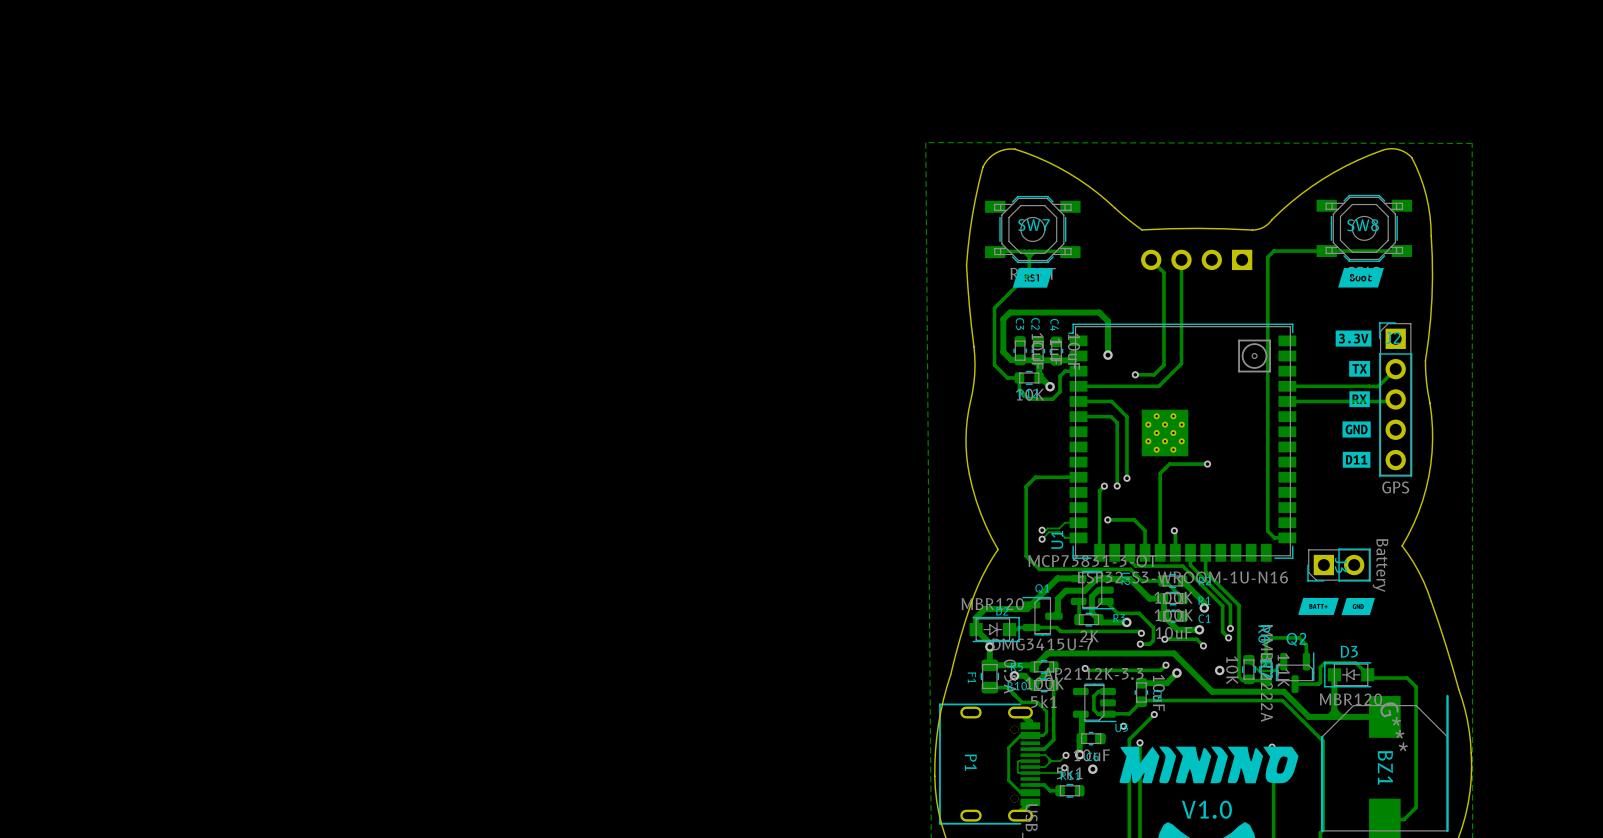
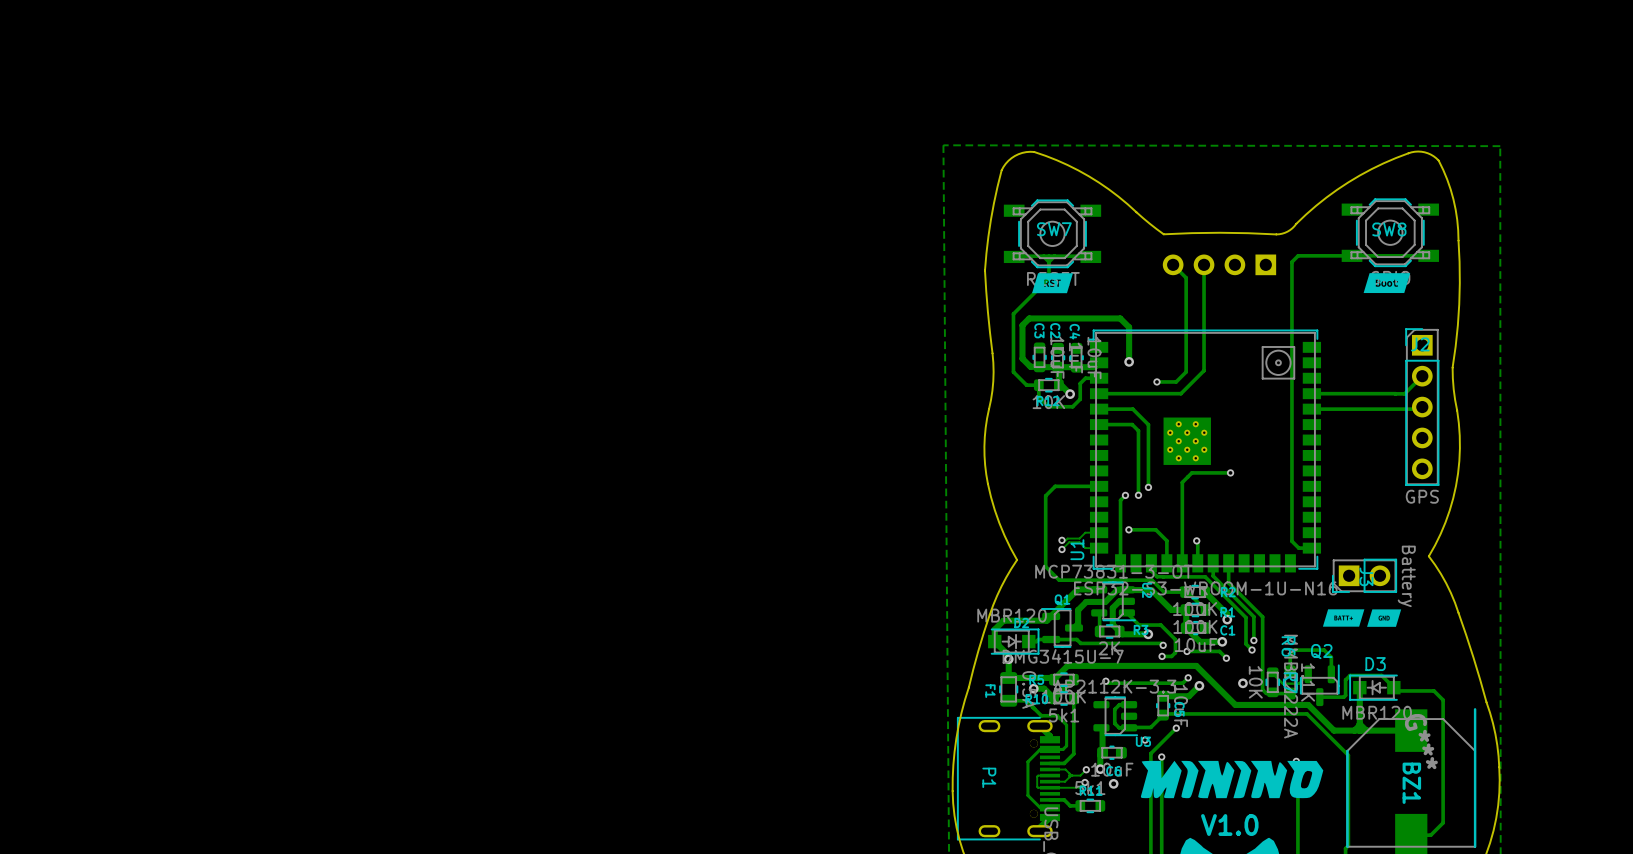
drawing: [1335, 330, 1372, 347] -> none
drawing: [1349, 361, 1371, 377] -> none
drawing: [1349, 391, 1370, 408] -> none
drawing: [1342, 421, 1371, 468] -> none

